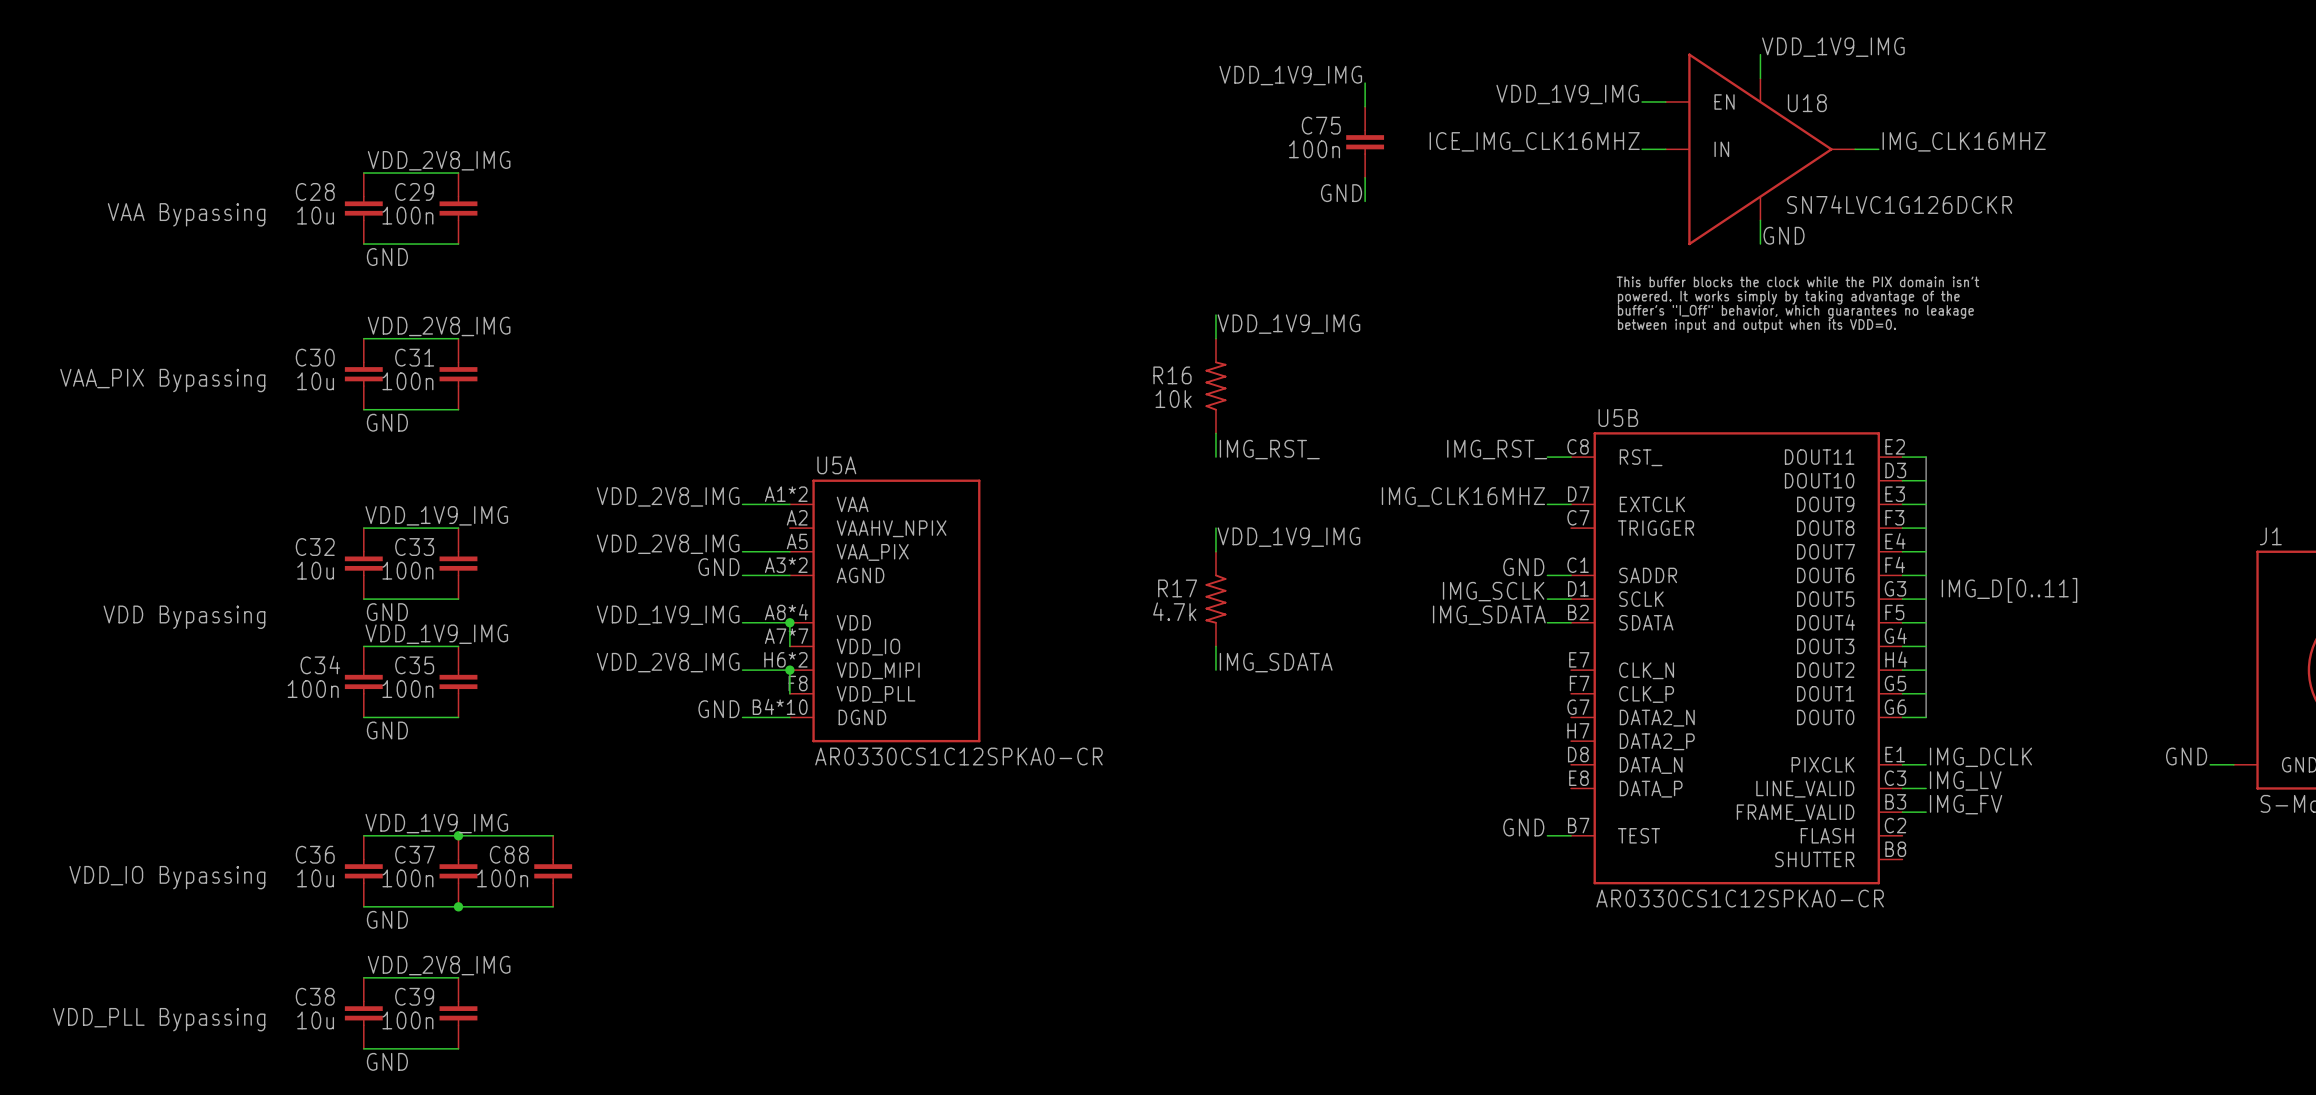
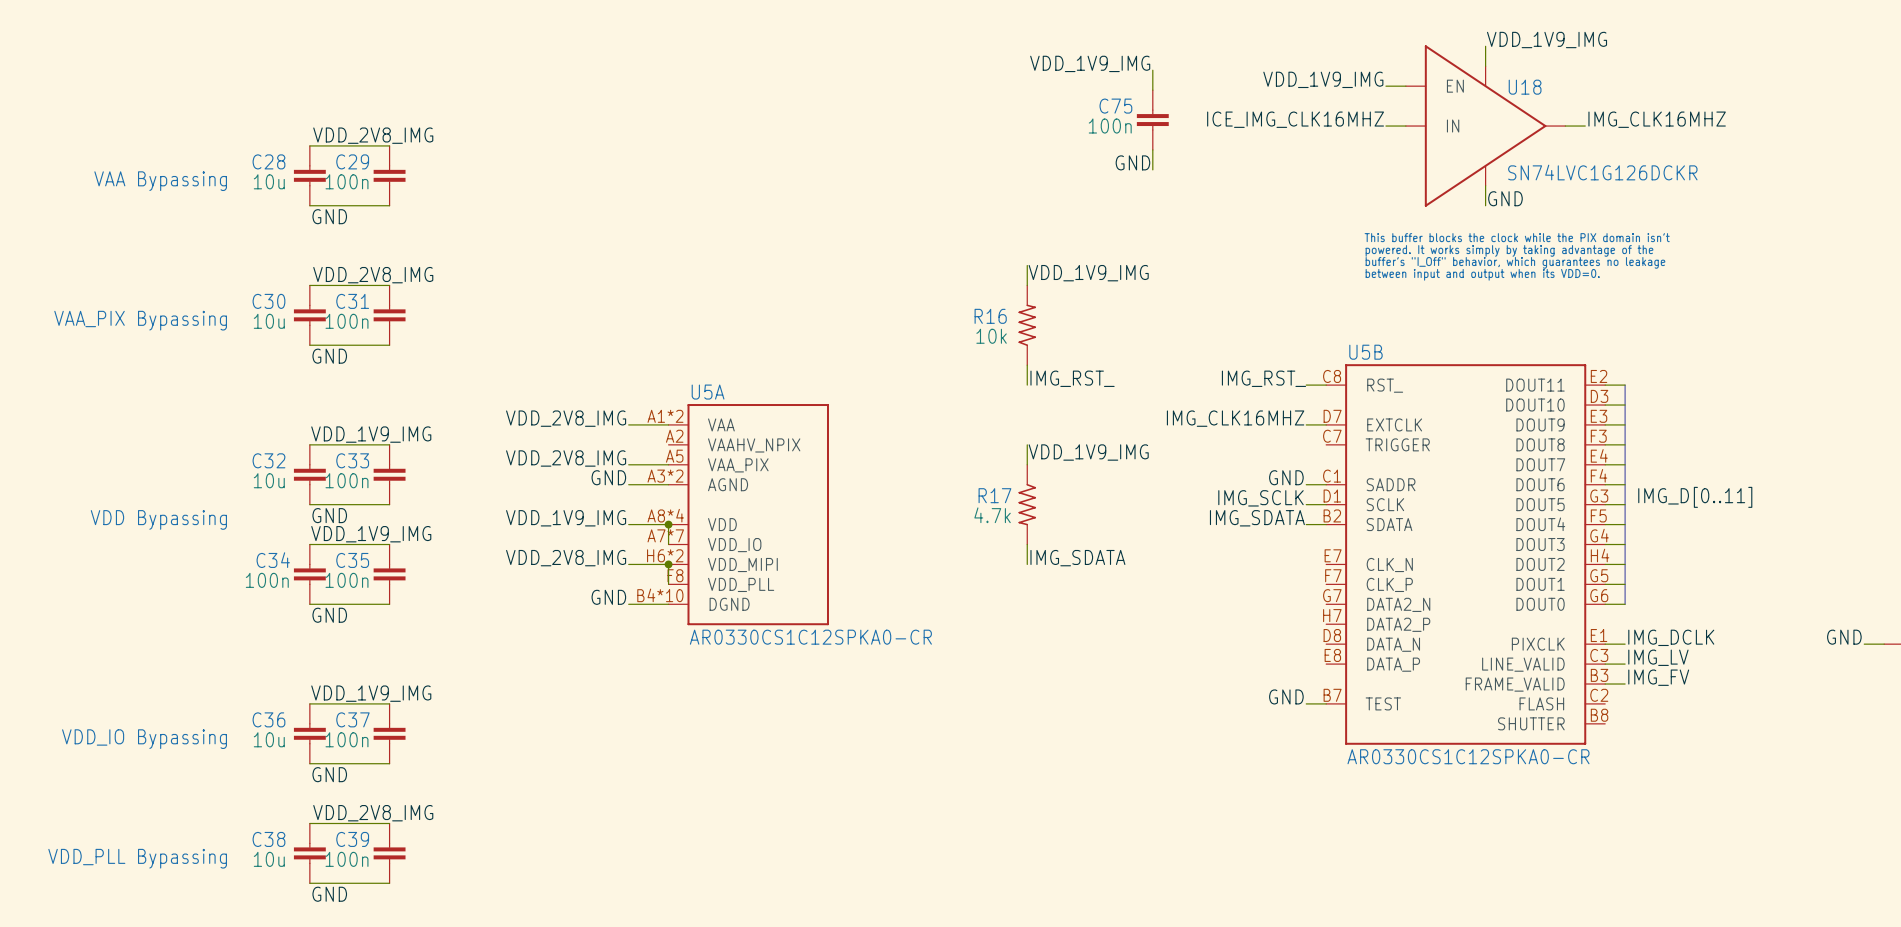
wire: (458, 835) (553, 835) -> none
junction: (458, 835) -> none
C88: 100n (553, 871) -> none
wire: (458, 906) (553, 906) -> none
junction: (458, 906) -> none

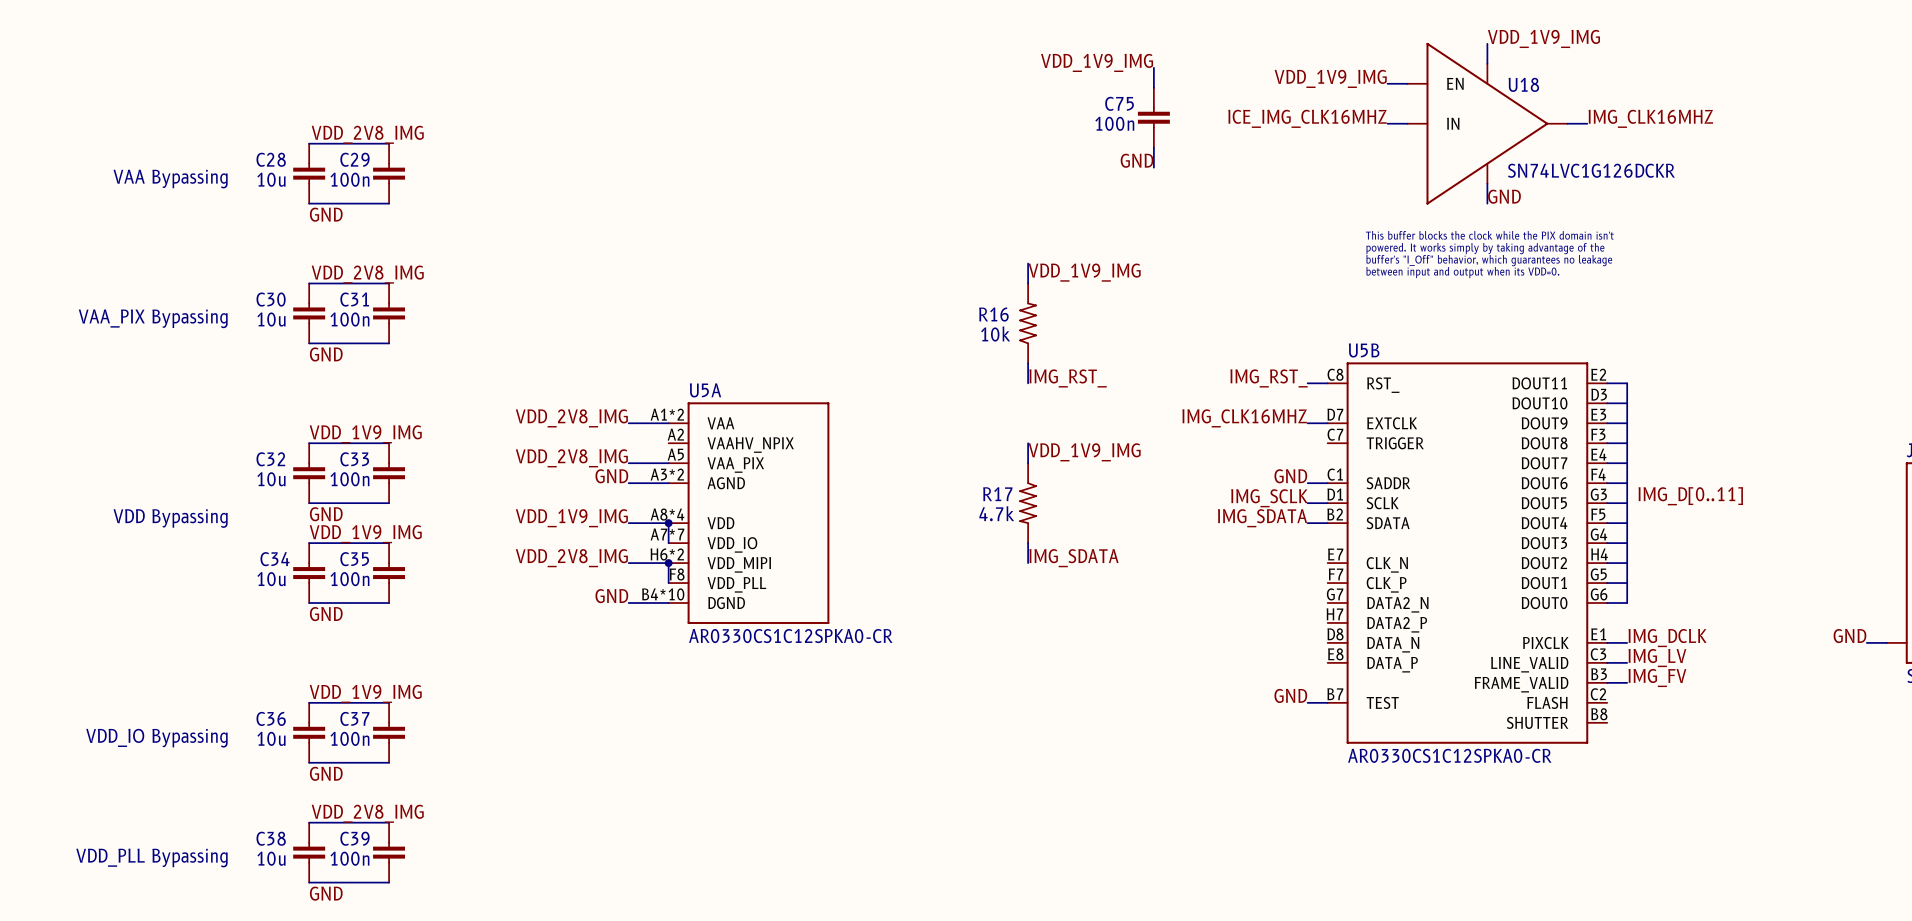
C34 value: 100n (267, 580) -> 10u (271, 579)

